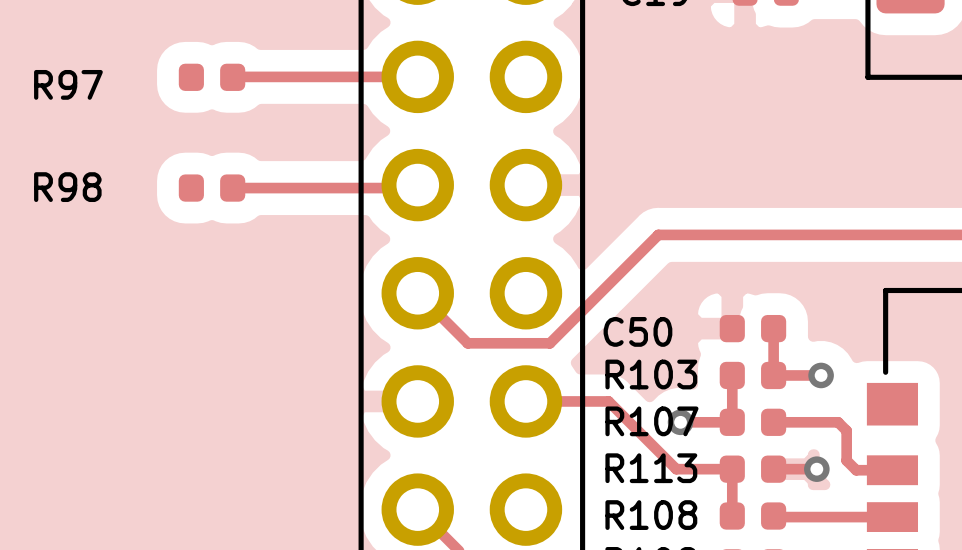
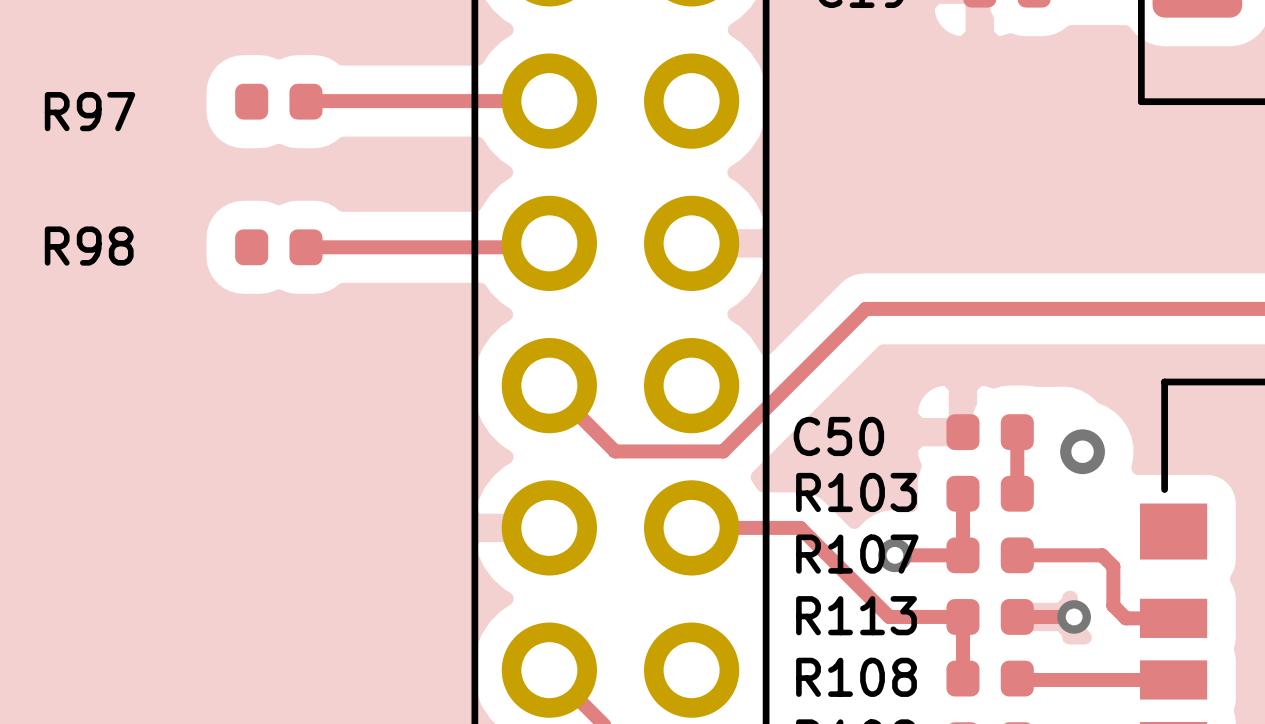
via: none -> (1082, 451)
track: (773, 375) (821, 375) -> none
via: (821, 375) -> none

